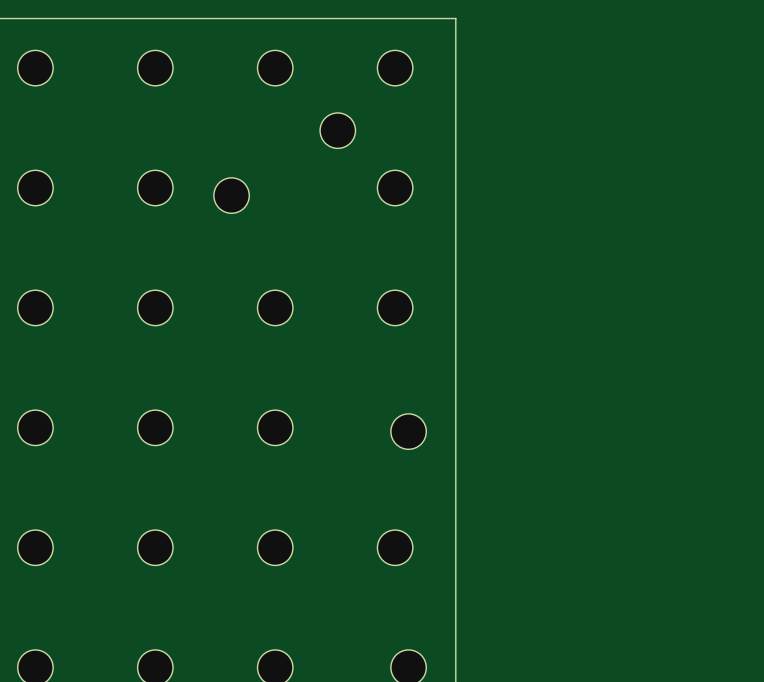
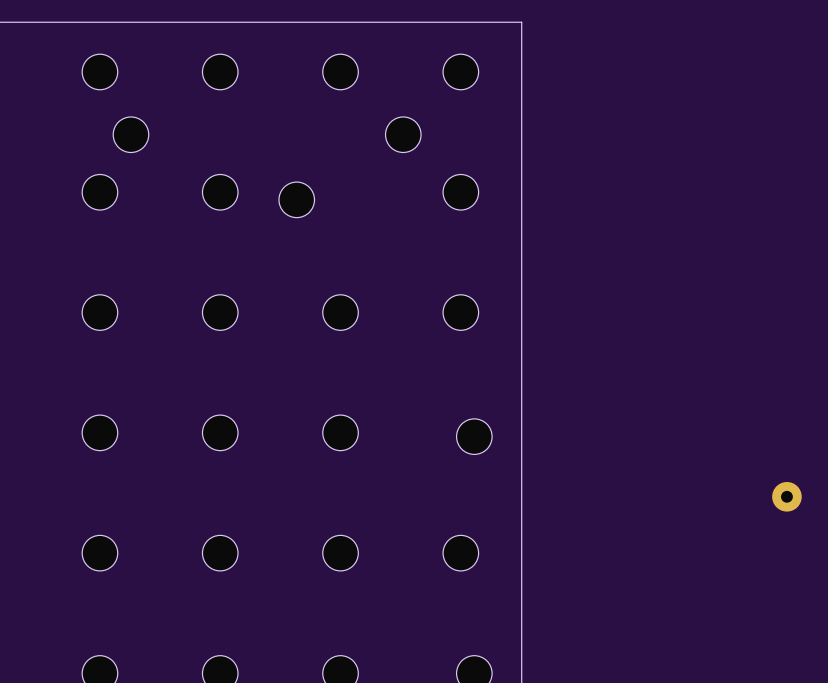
part: none -> (130, 134)
part: none -> (786, 496)

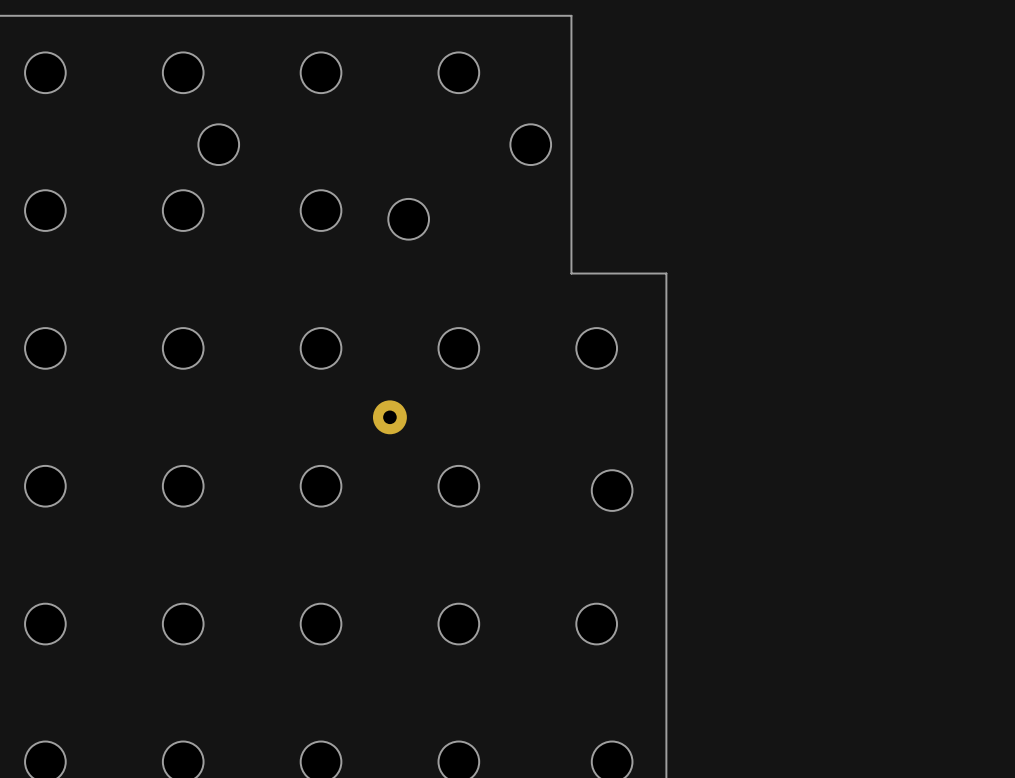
board edge: (438, 22) (521, 22) (521, 247) -> (571, 15) (571, 273) (666, 273)
part: (460, 71) -> none
part: (460, 192) -> none
part: none -> (389, 417)
part: (786, 496) -> none

